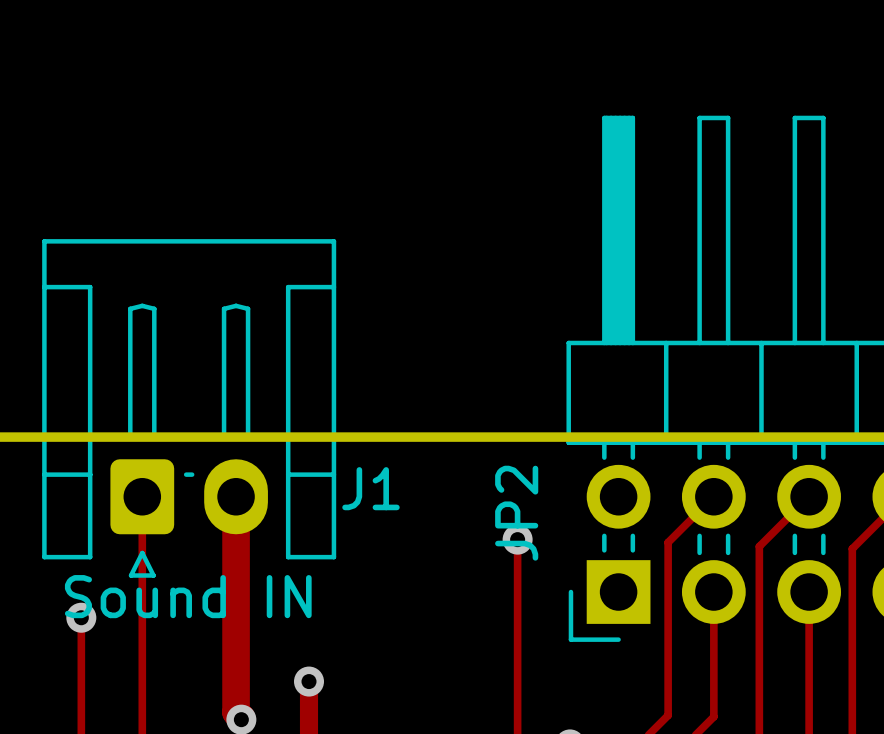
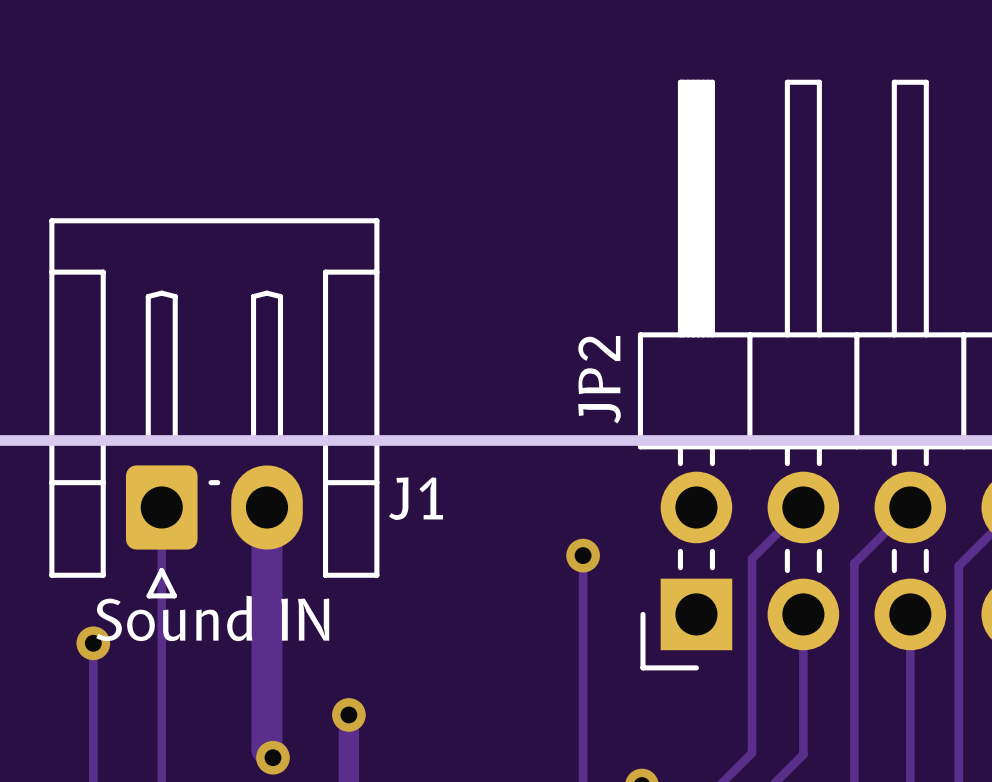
JP2 name position: JP2 (516, 513) -> JP2 (599, 379)

